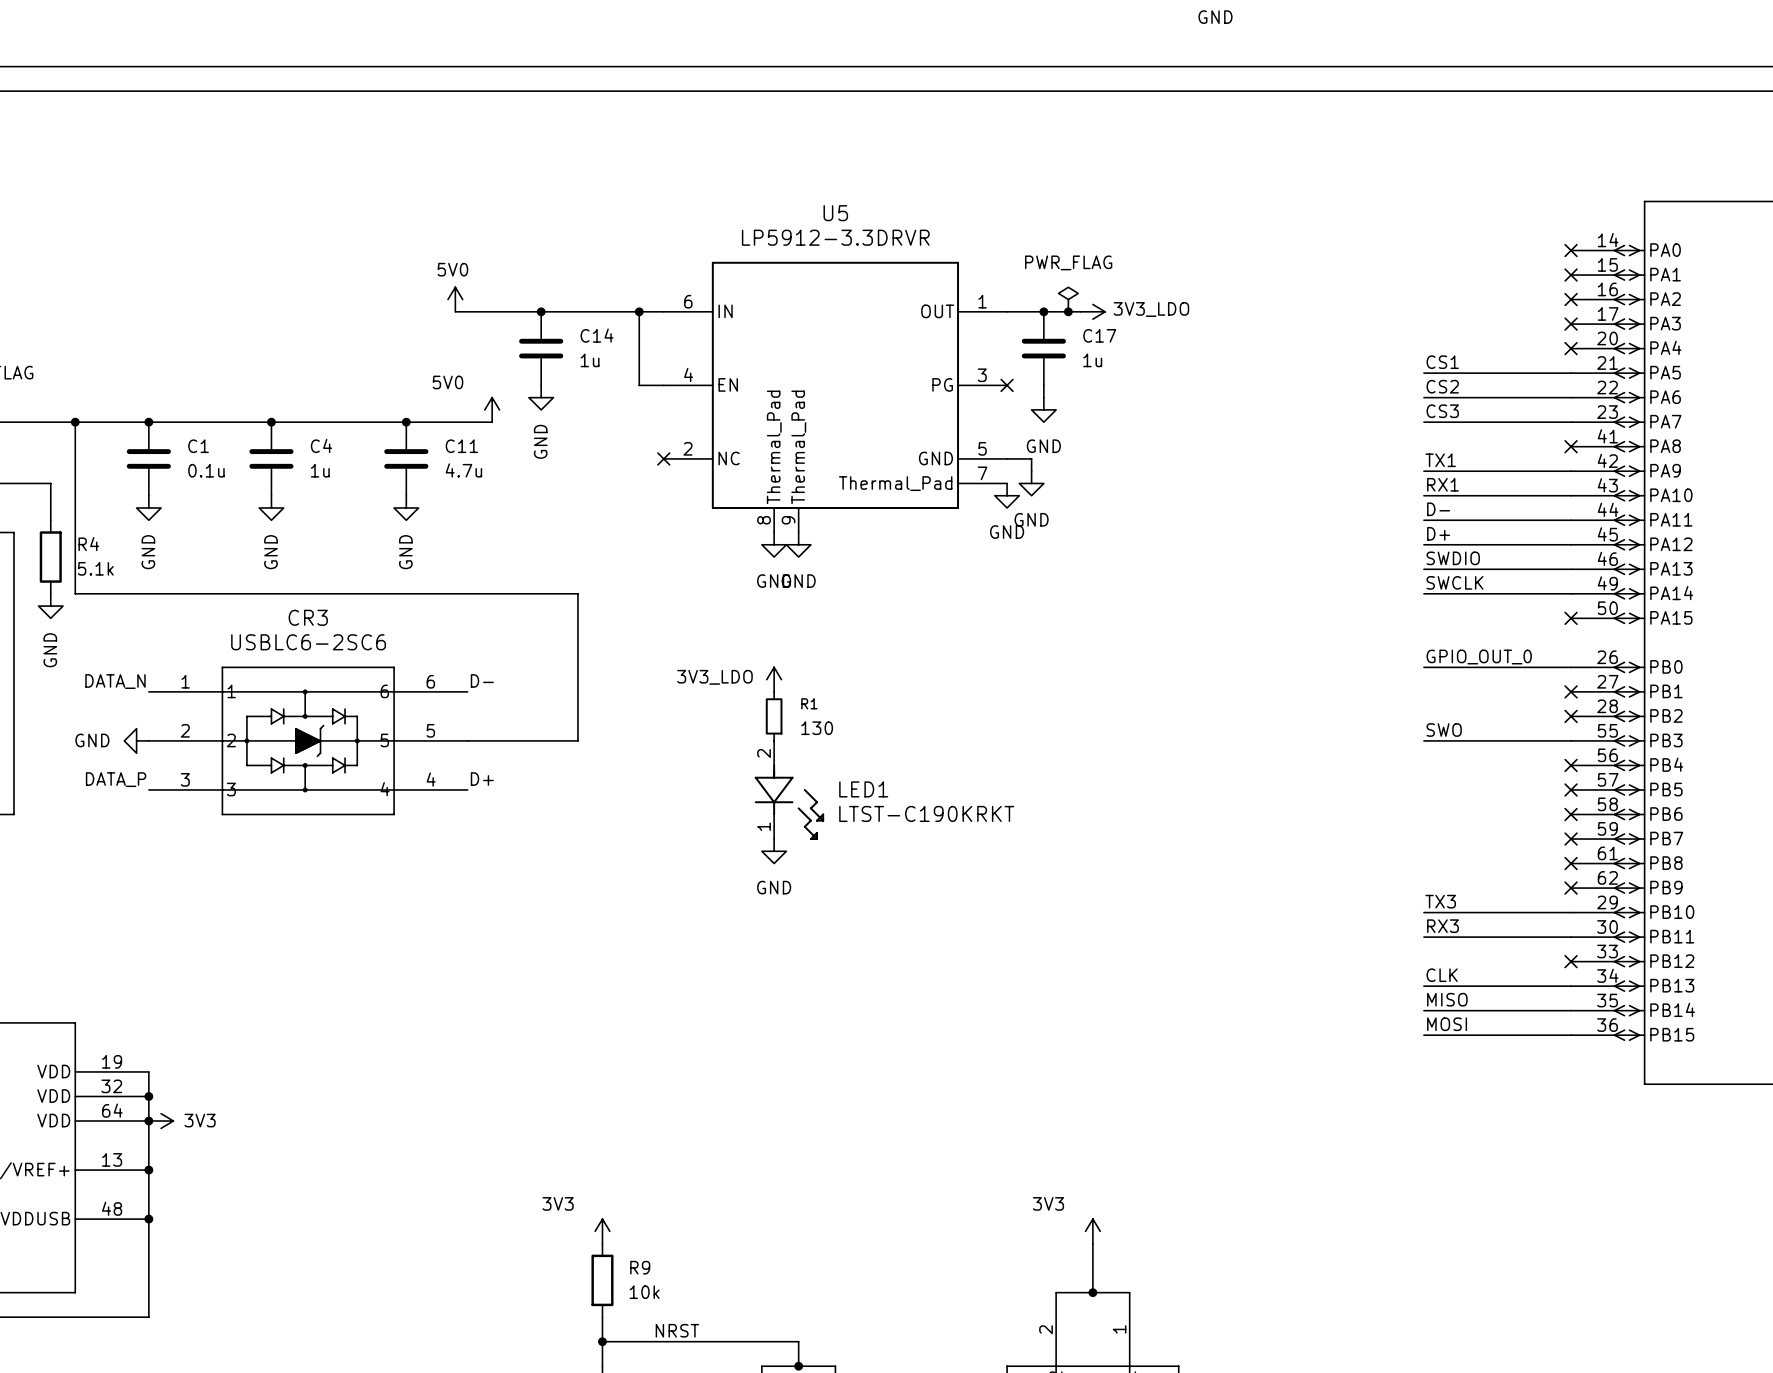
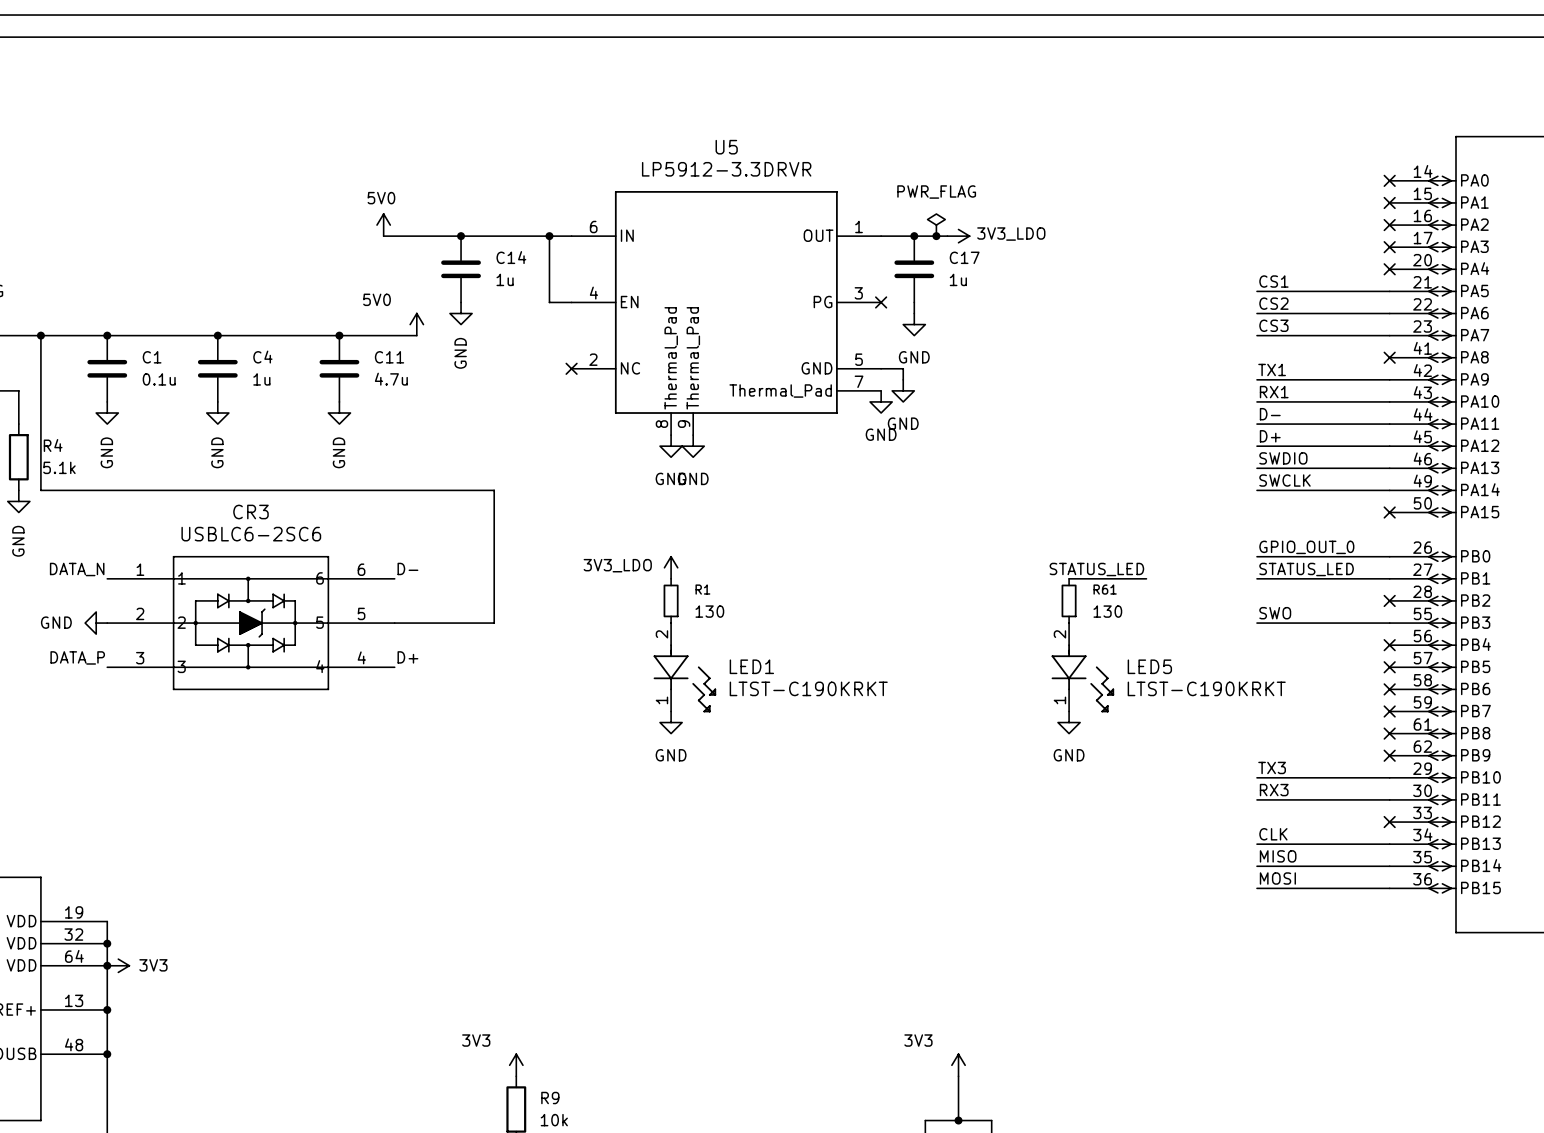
label: none -> STATUS_LED (1096, 569)
label: none -> STATUS_LED (1306, 569)
wire: none -> (1069, 578) (1146, 578)
wire: none -> (1257, 578) (1389, 578)
no-connect mark: (1571, 691) -> none
R61: none -> 130 (1069, 600)
LED5: none -> LTST-C190KRKT (1082, 667)
power symbol: none -> GND (1069, 722)

